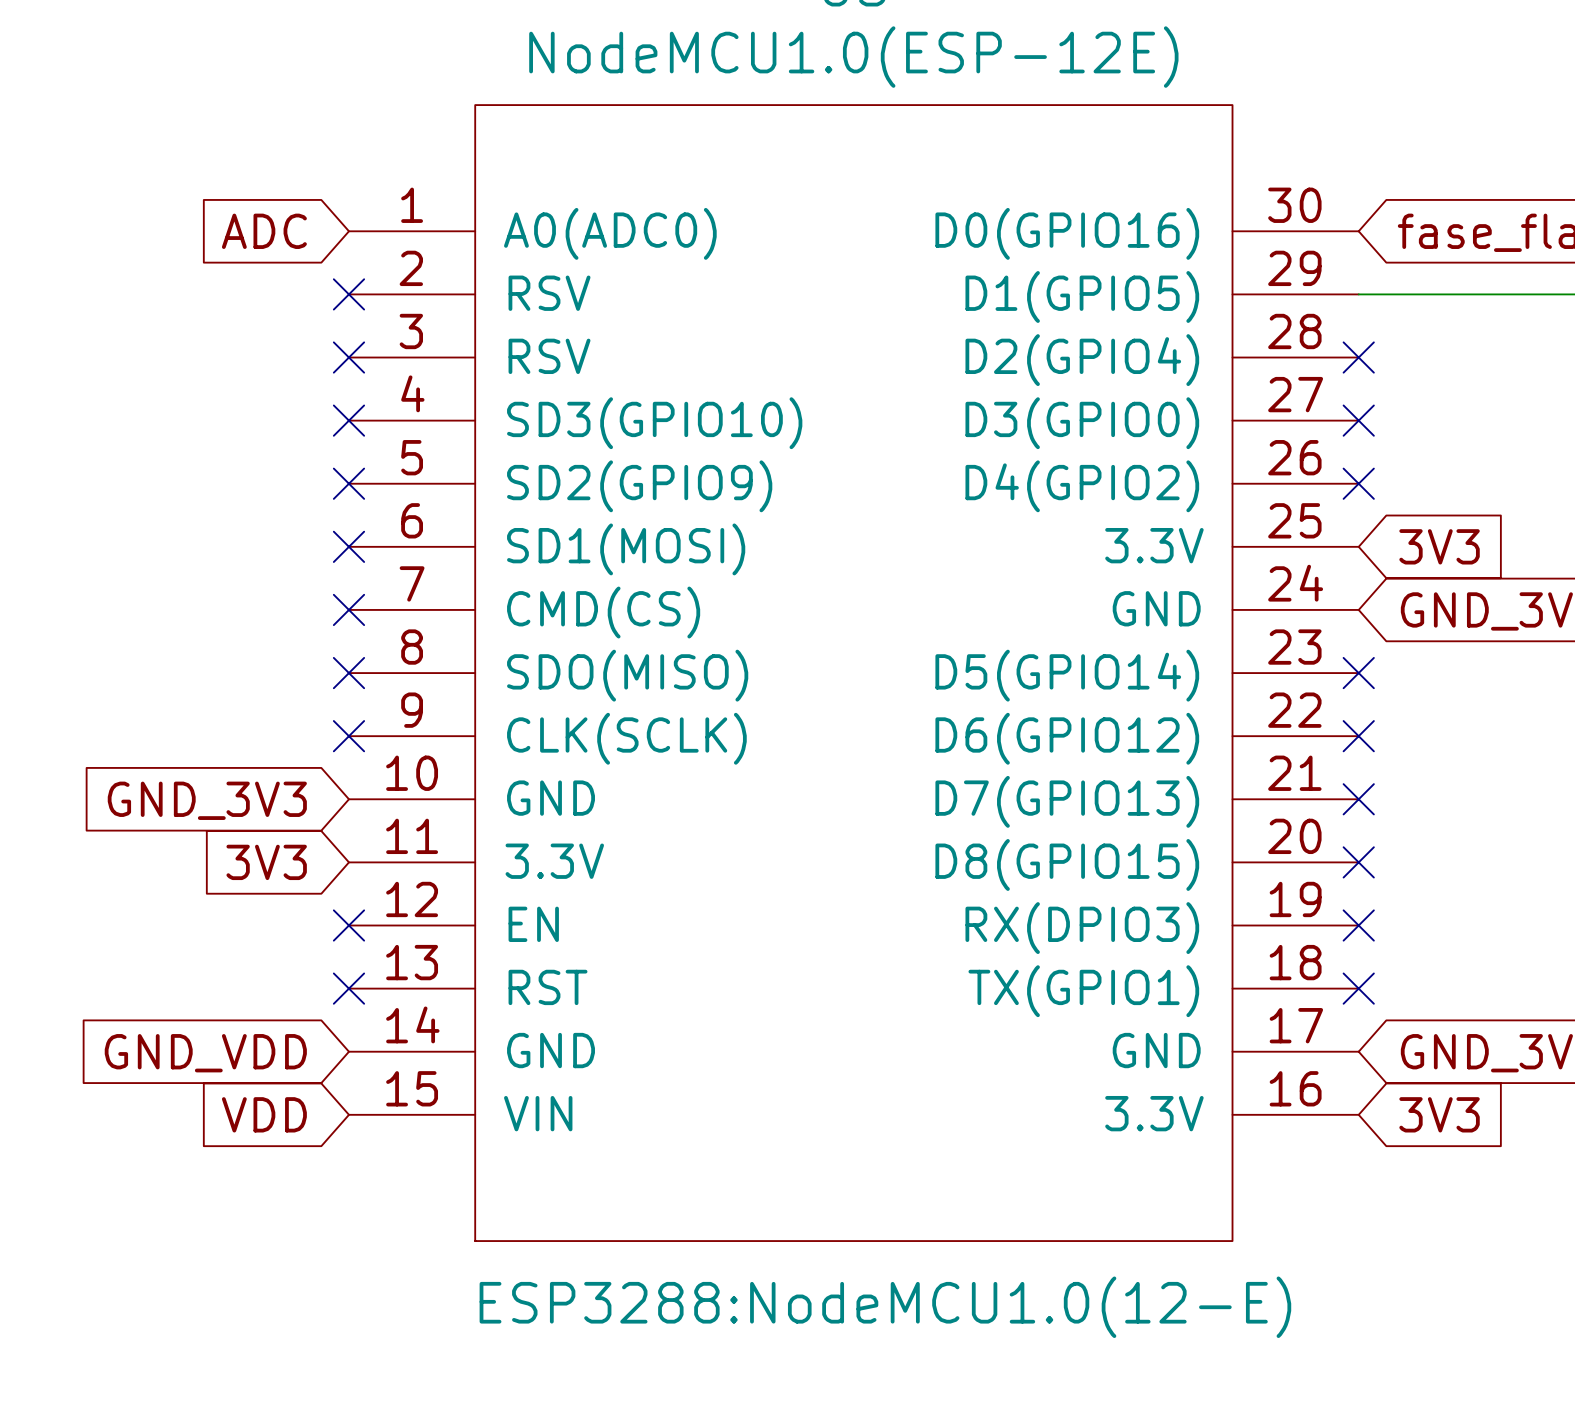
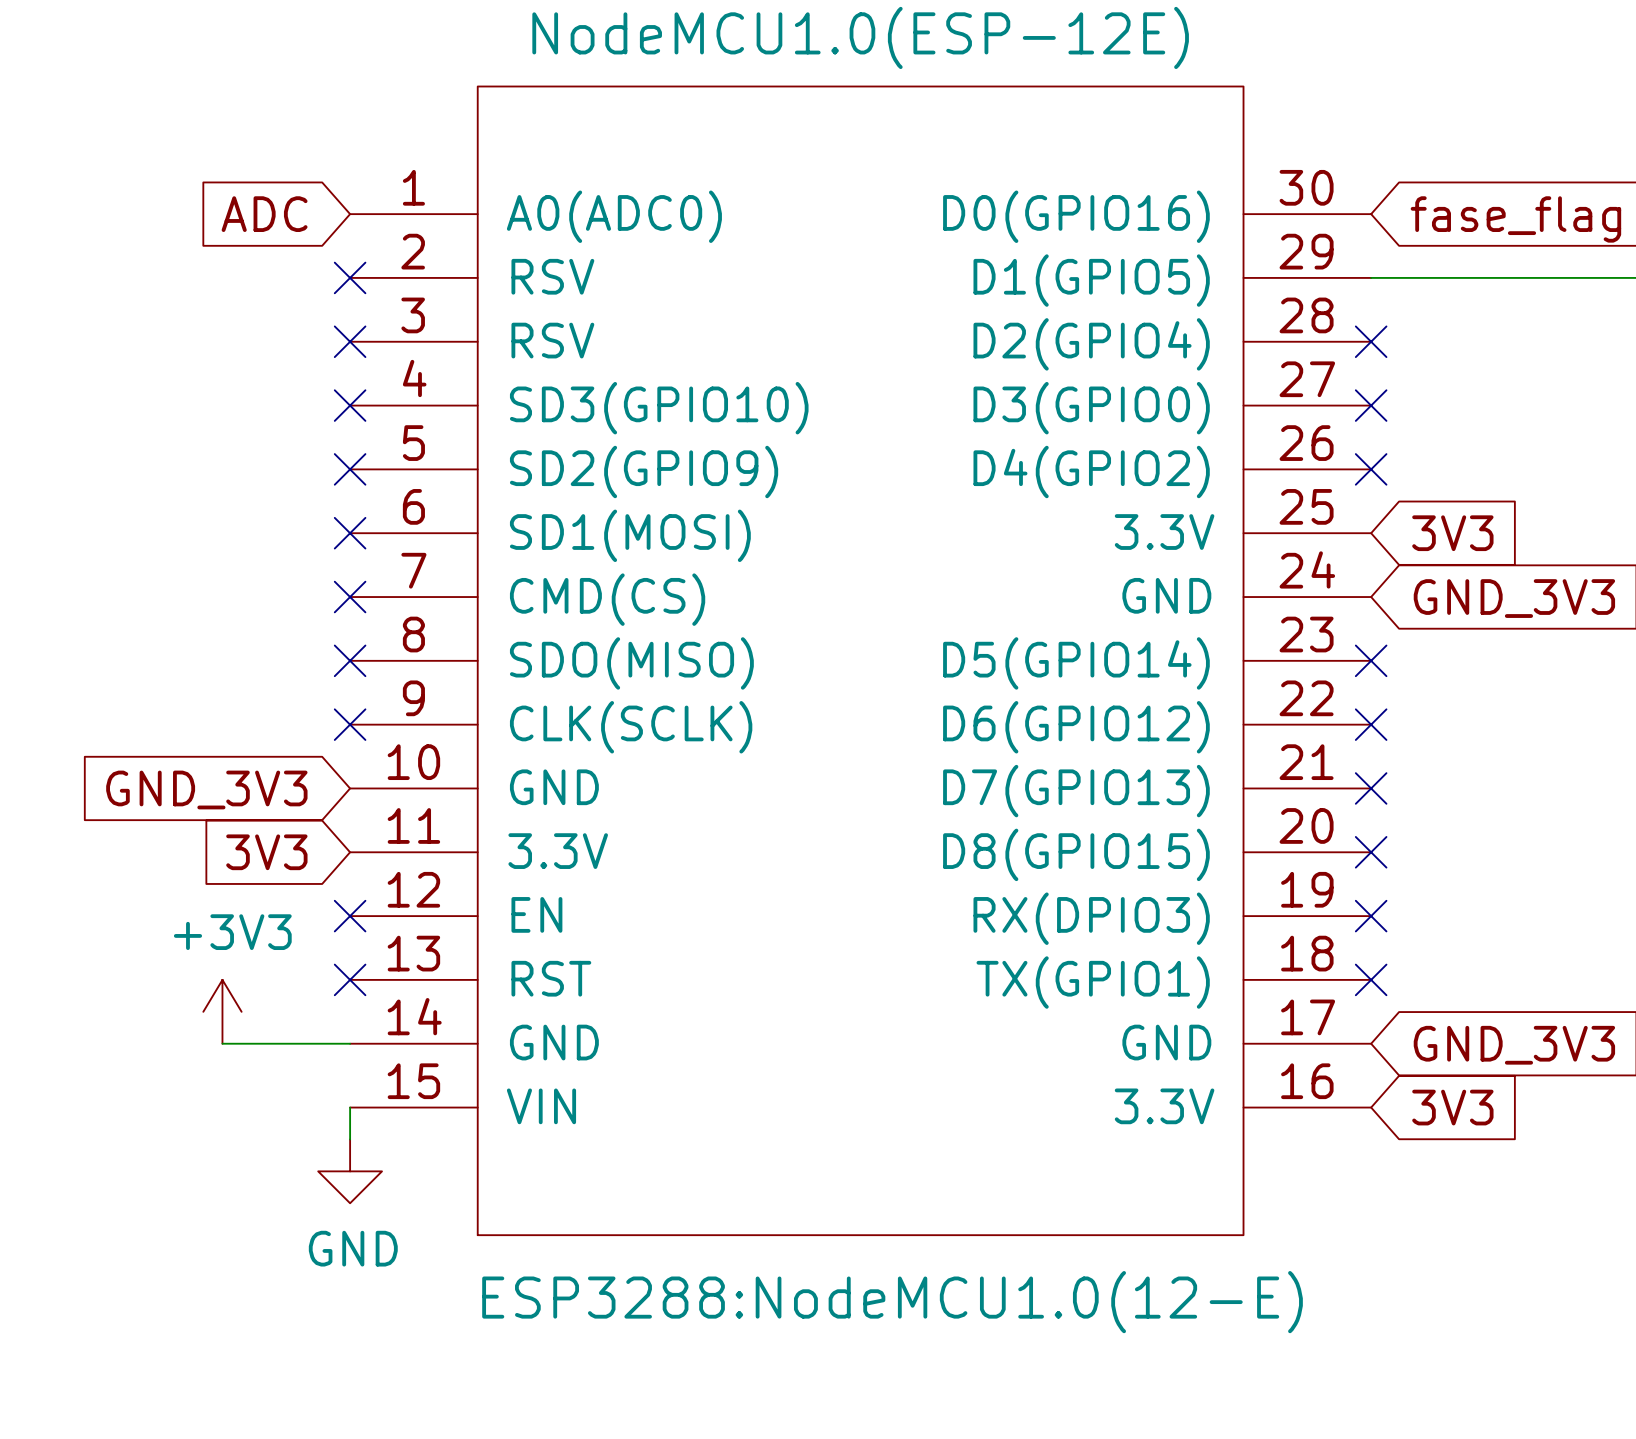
power symbol: none -> +3V3 (222, 1011)
wire: none -> (222, 1043) (350, 1043)
global label: GND_VDD (205, 1053) -> none
global label: VDD (264, 1114) -> none
wire: none -> (350, 1107) (350, 1139)
power symbol: none -> GND (350, 1171)

